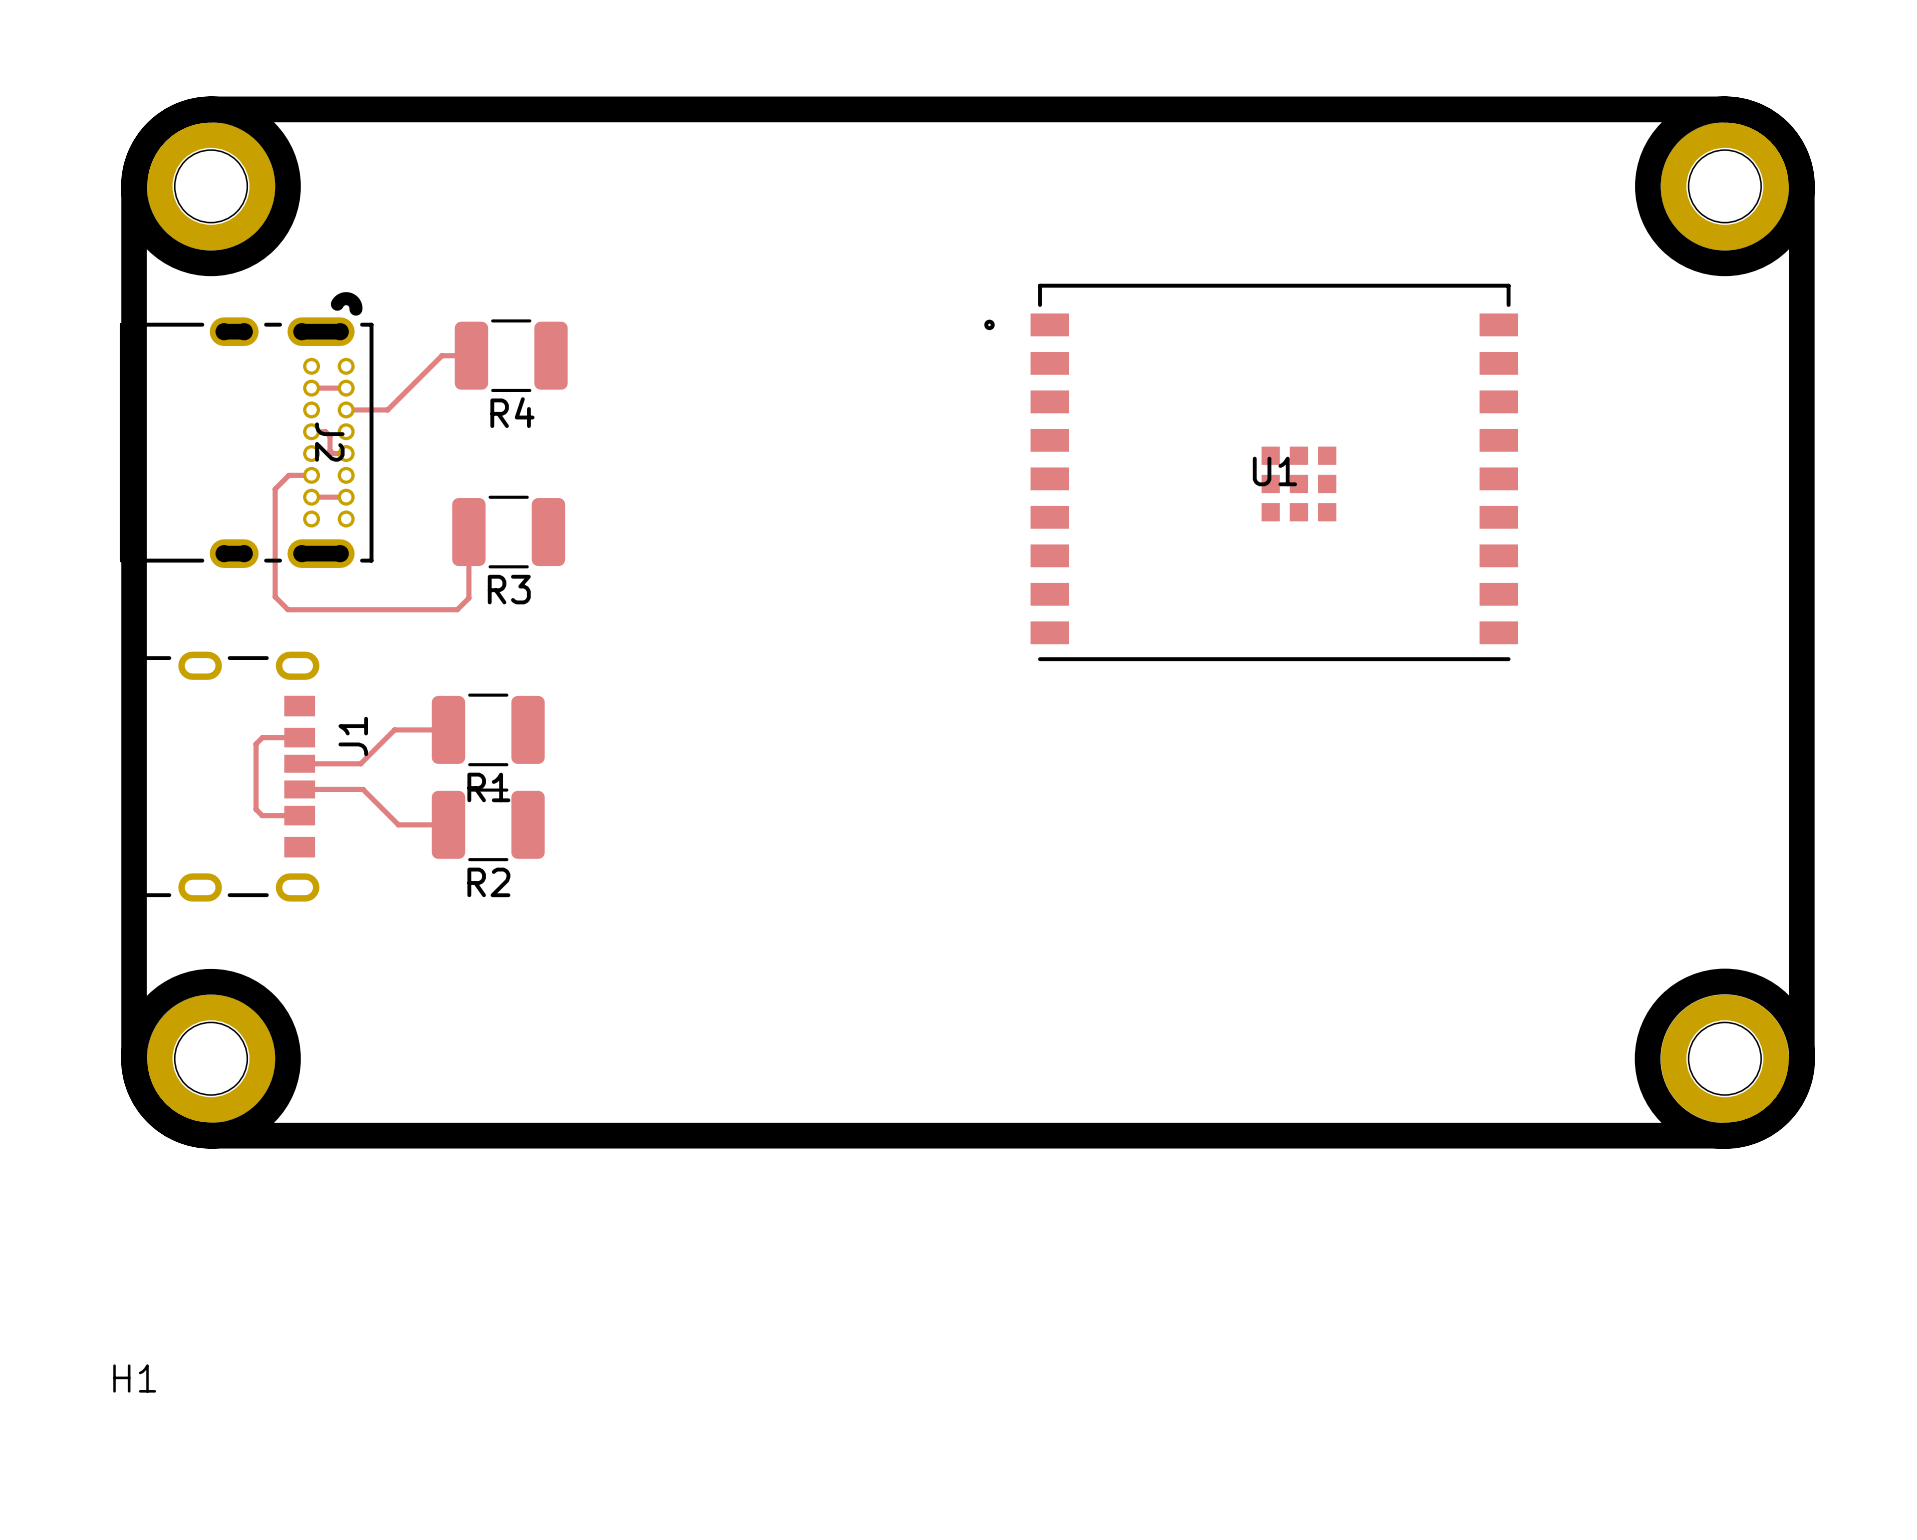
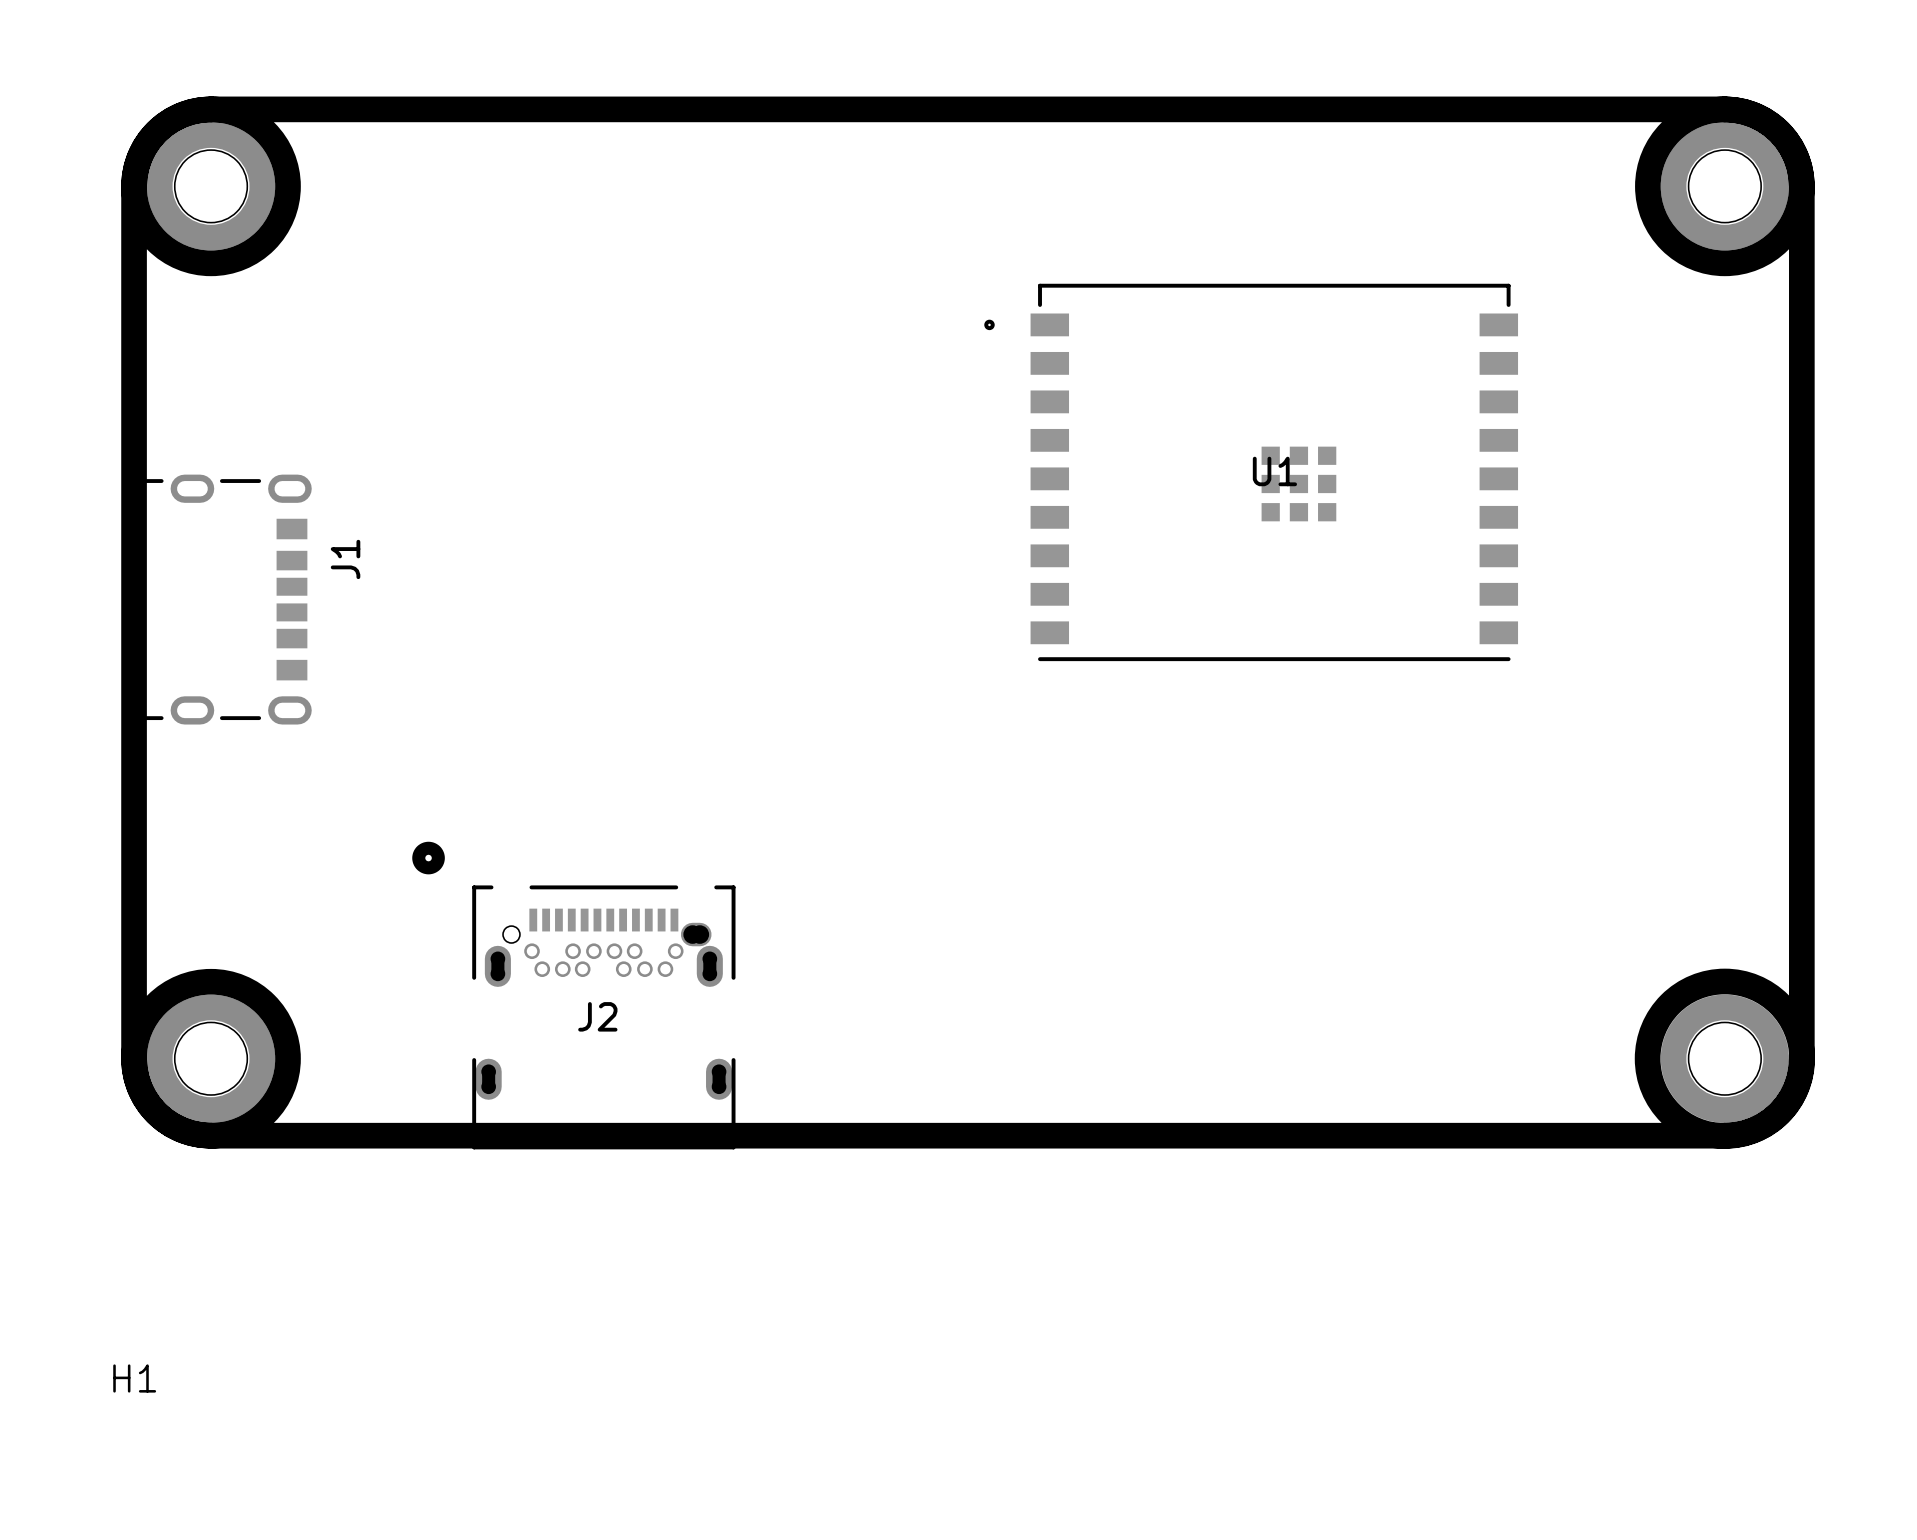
J2 footprint: [119, 292, 374, 568] -> [412, 841, 736, 1150]
track: (471, 355) (441, 355) (387, 409) (346, 409) -> none
R4: (511, 355) -> none
track: (311, 388) (346, 388) -> none
track: (311, 431) (325, 431) (330, 436) (330, 450) (332, 453) (346, 453) -> none
J2 name position: J2 (329, 442) -> J2 (597, 1016)
track: (311, 475) (288, 475) (275, 489) (275, 596) (288, 609) (457, 609) (468, 598) (468, 532) -> none
track: (311, 497) (346, 497) -> none
R3: (508, 532) -> none
track: (448, 729) (394, 729) (360, 763) (299, 763) -> none
R1: (488, 729) -> none
track: (299, 737) (262, 737) (256, 744) (256, 809) (262, 815) (299, 815) -> none
J1 position: (227, 776) -> (219, 599)
track: (299, 789) (363, 789) (398, 824) (448, 824) -> none
R2: (488, 824) -> none

